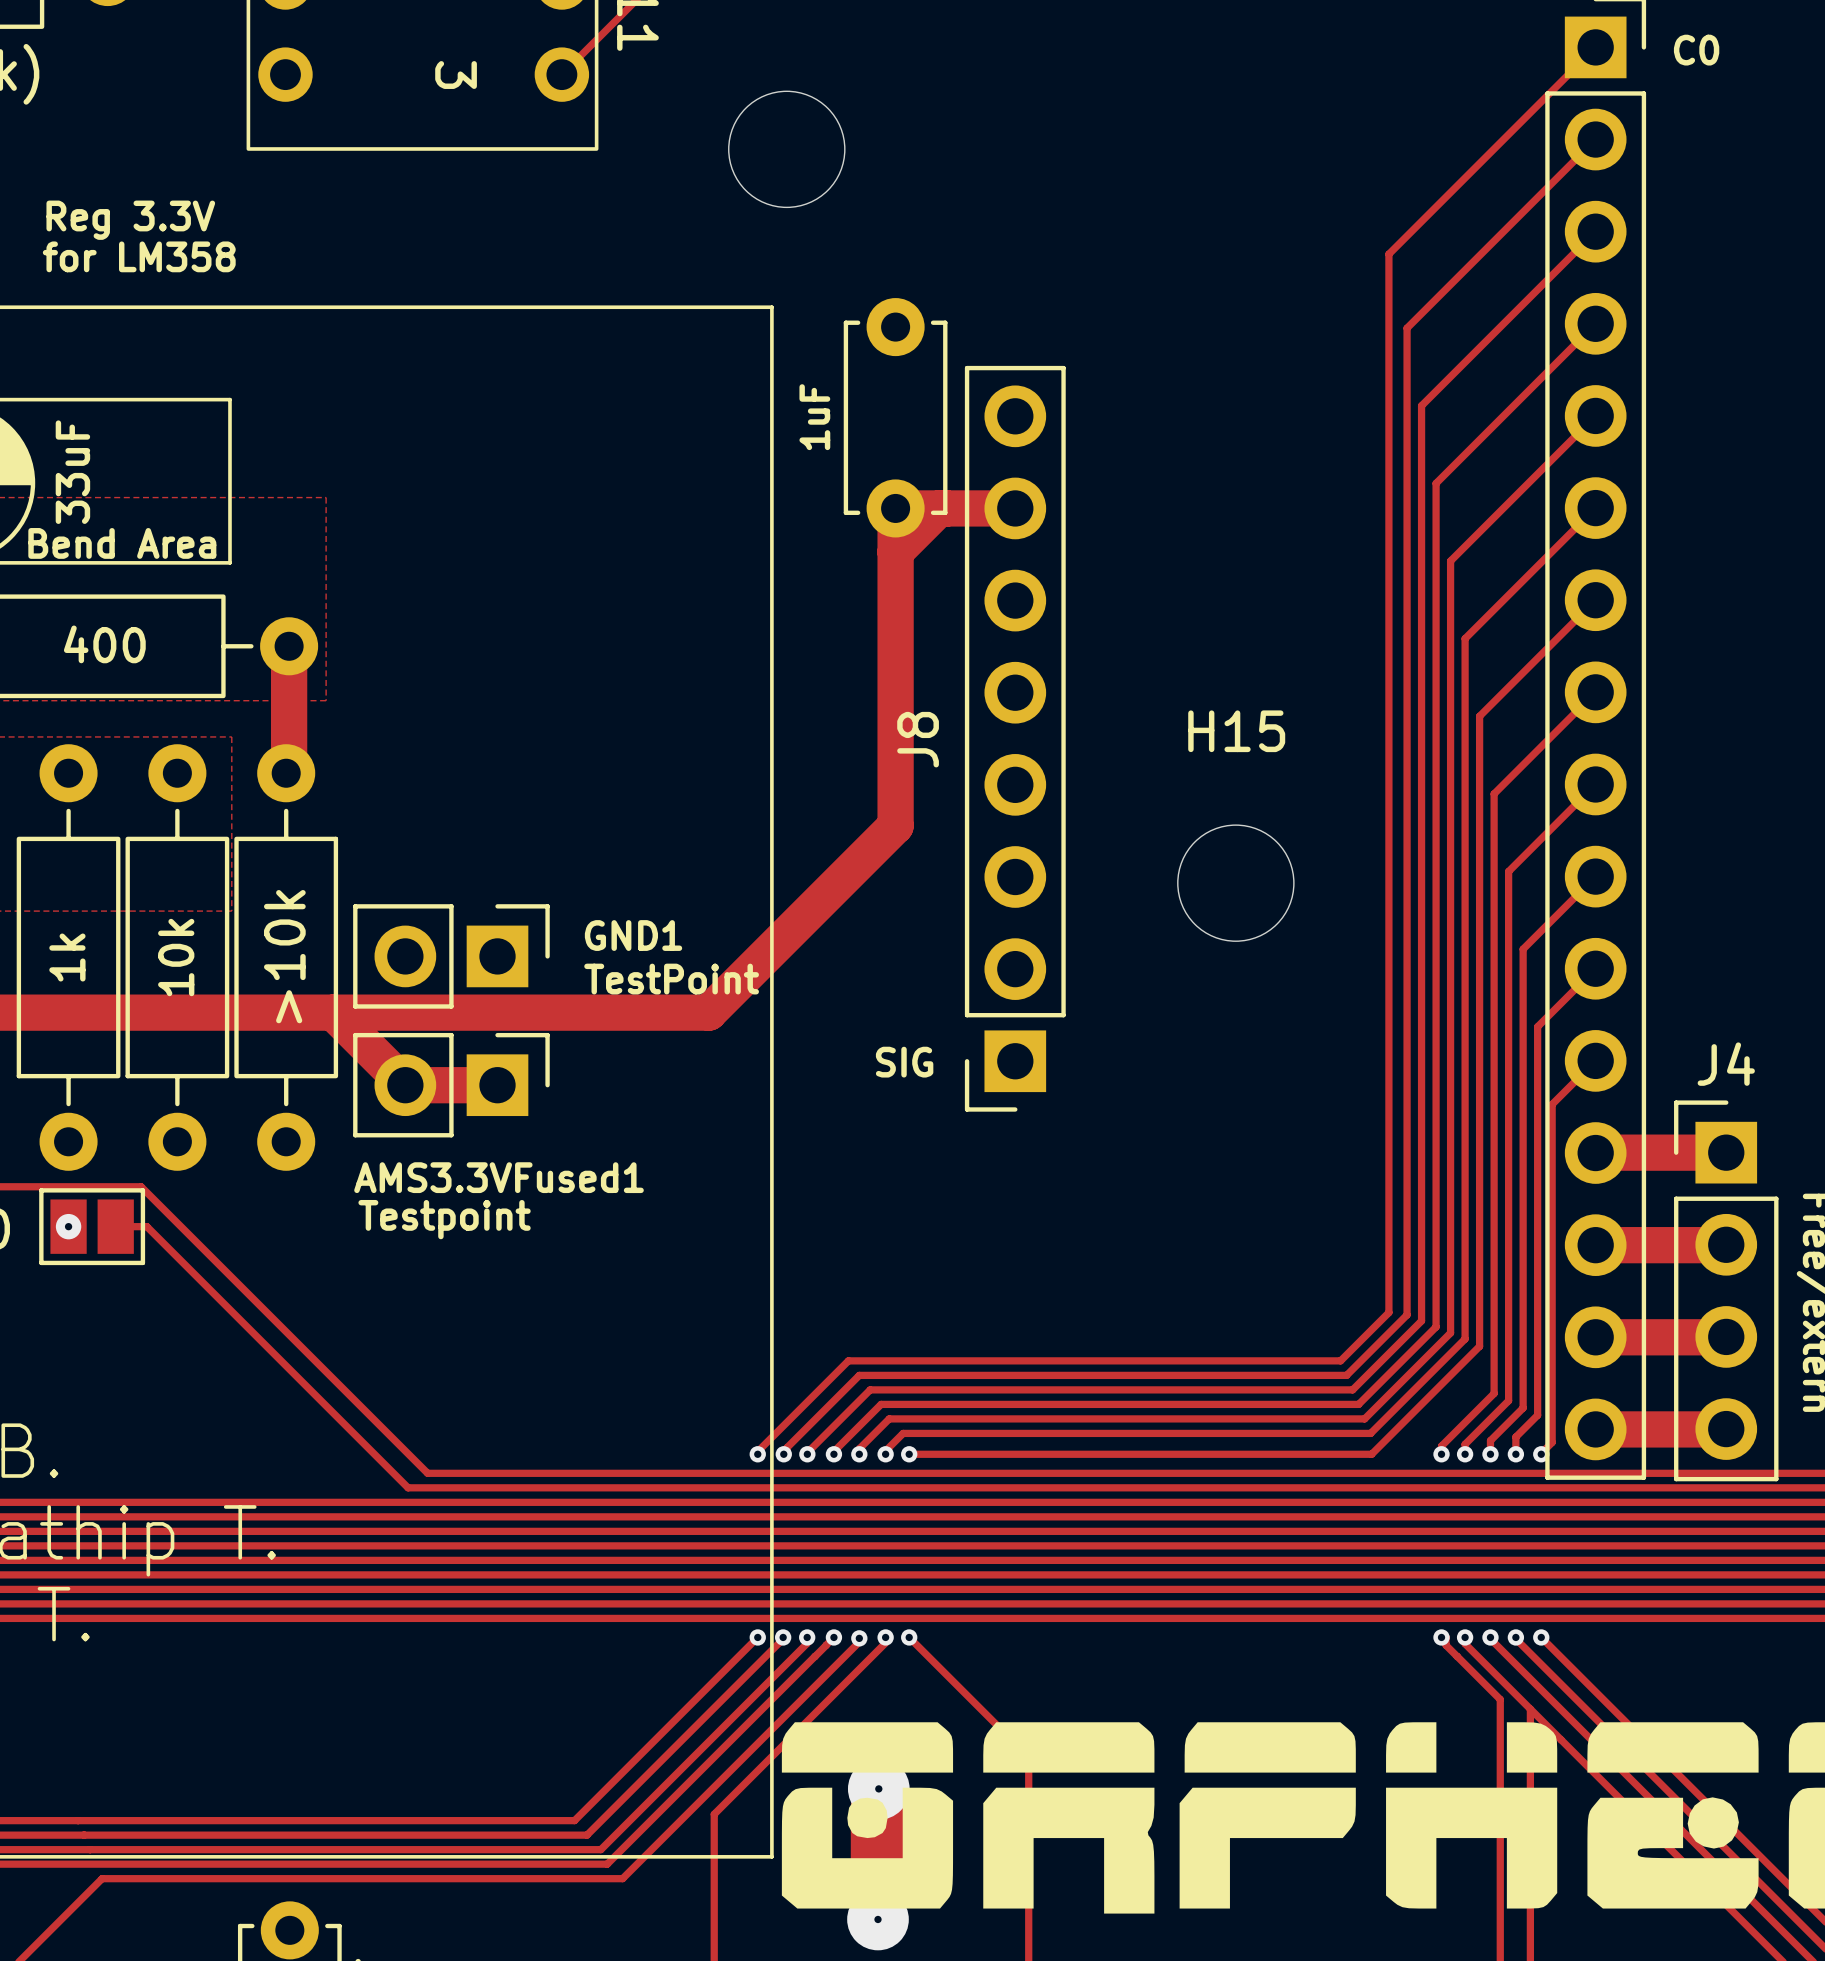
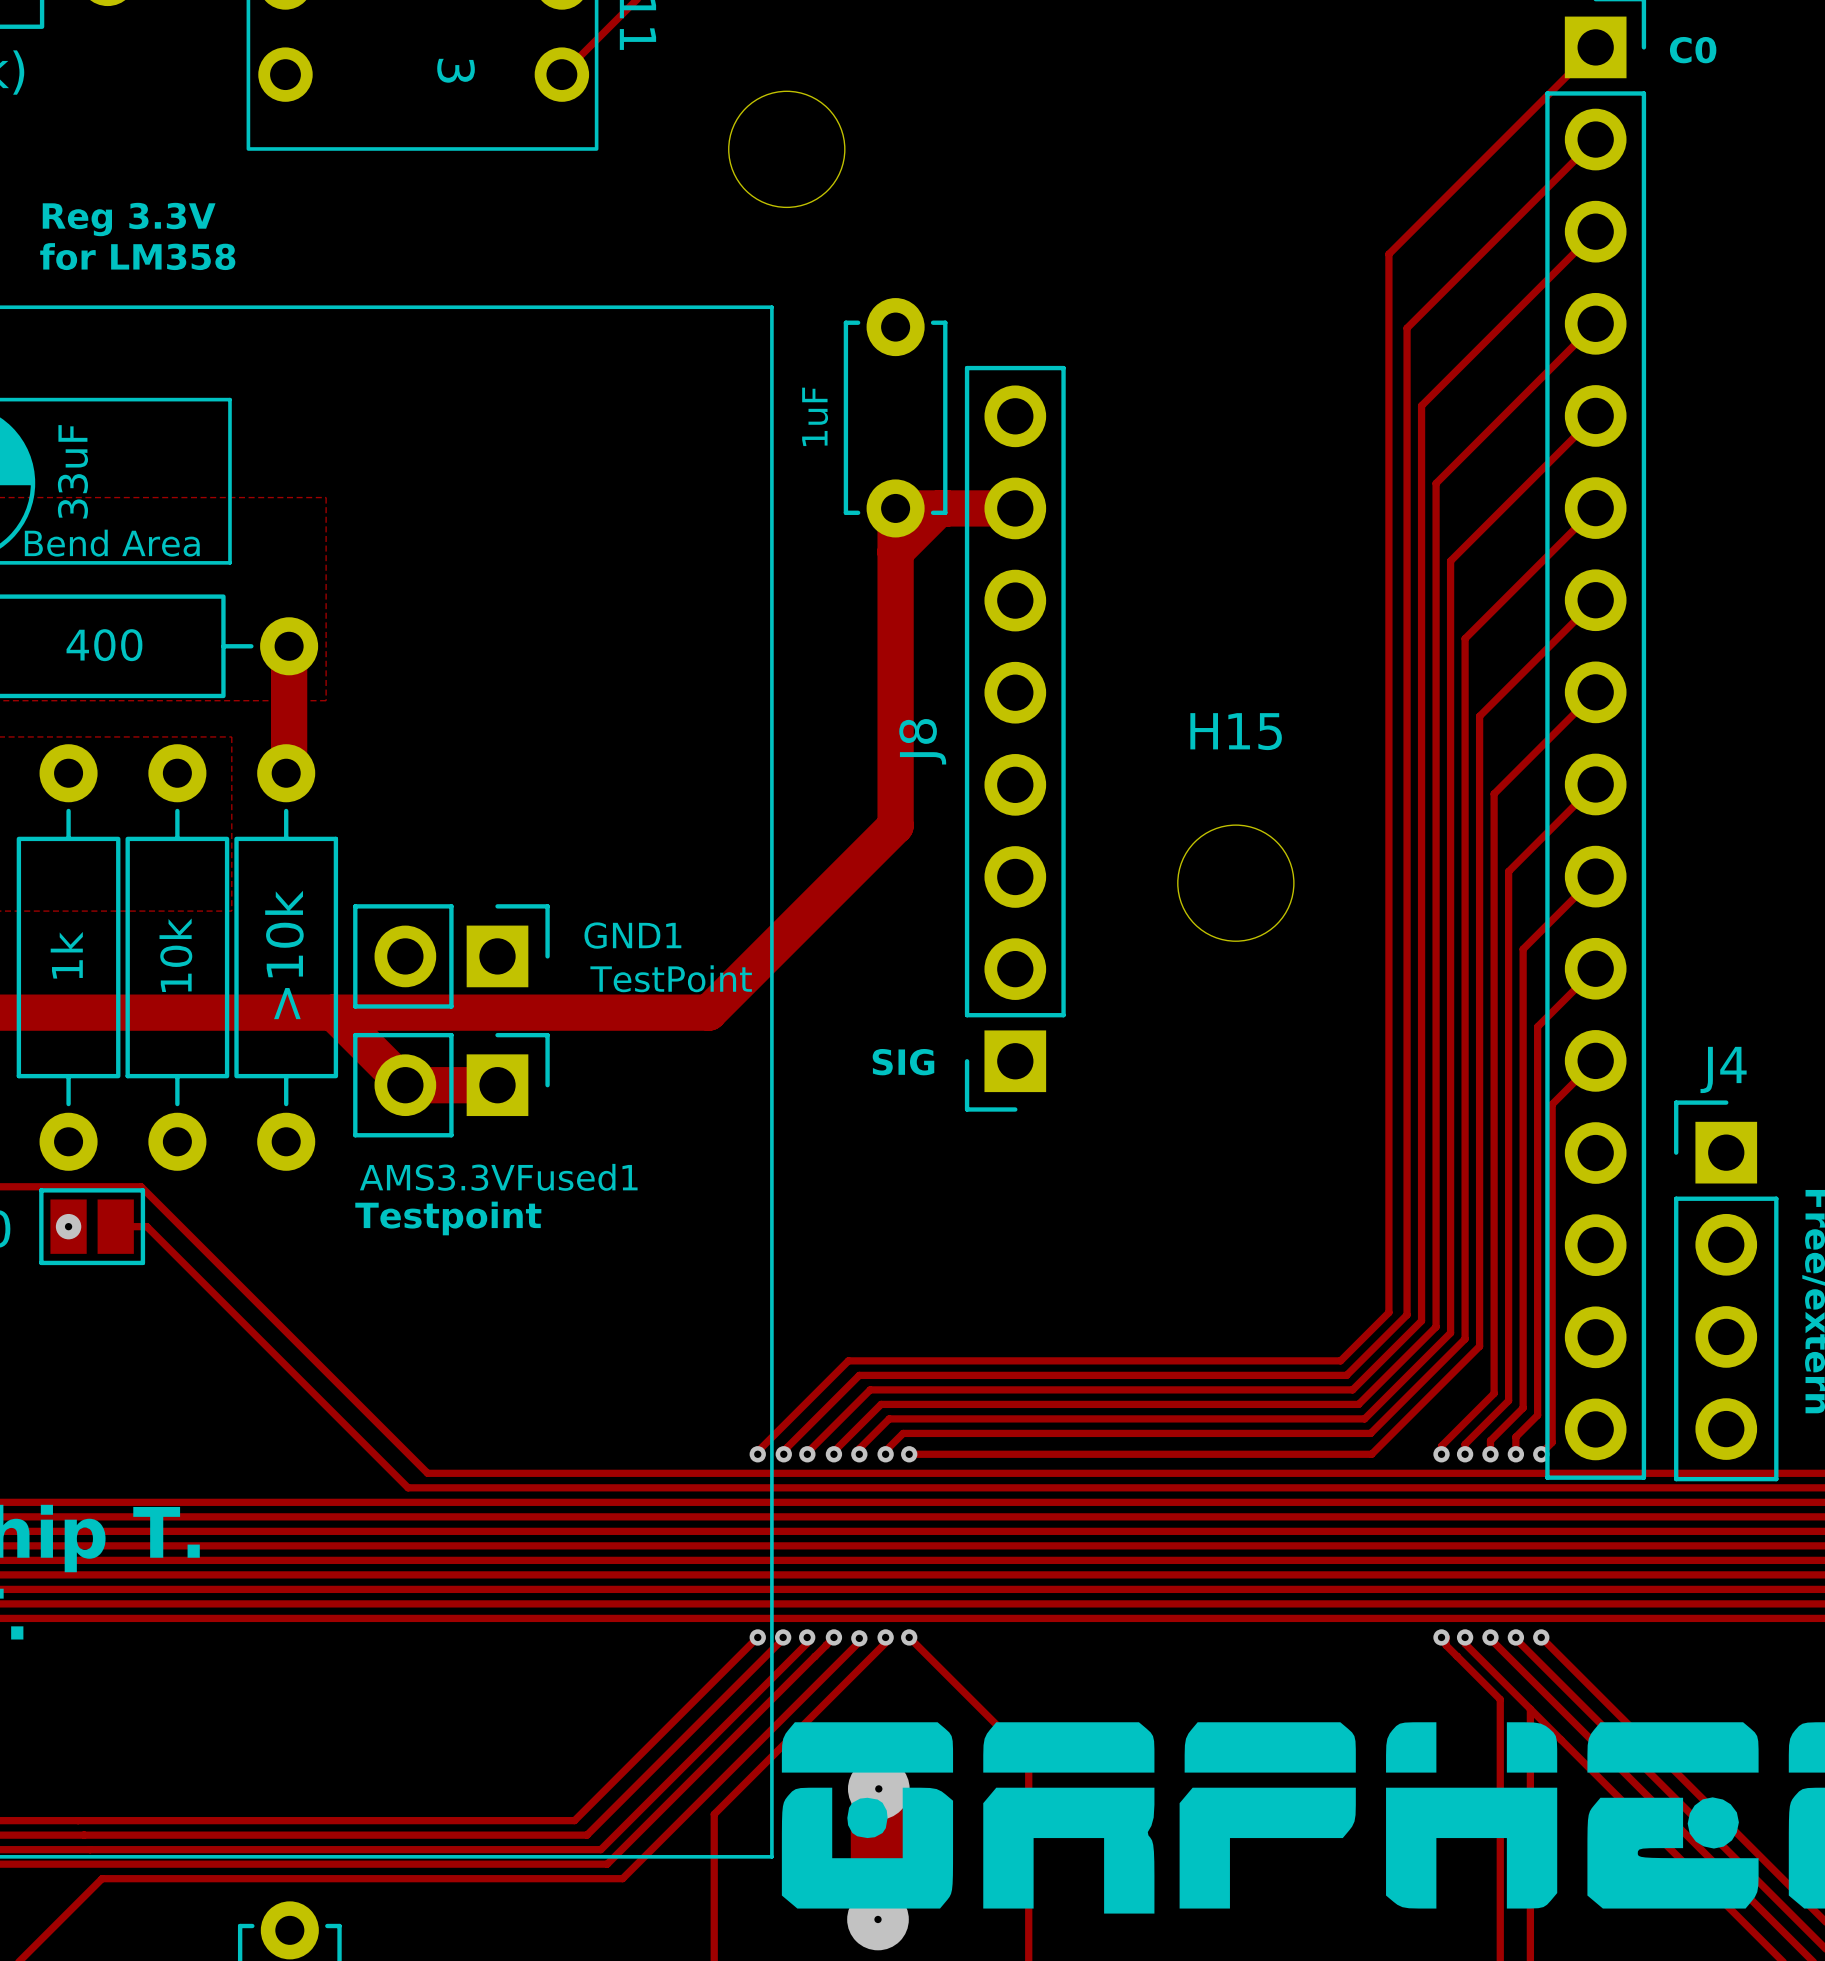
track: (1596, 1152) (1726, 1152) -> none
track: (1595, 1245) (1725, 1245) -> none
track: (1595, 1337) (1725, 1337) -> none
track: (1595, 1429) (1725, 1429) -> none

